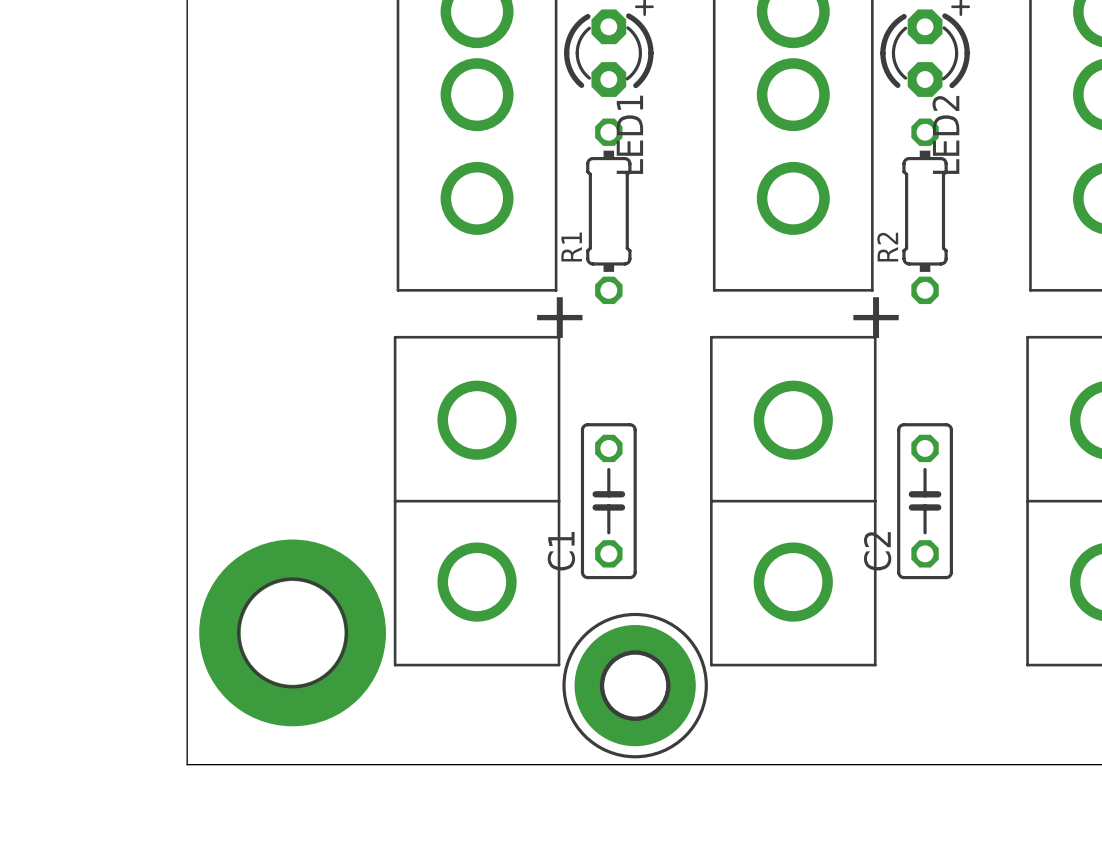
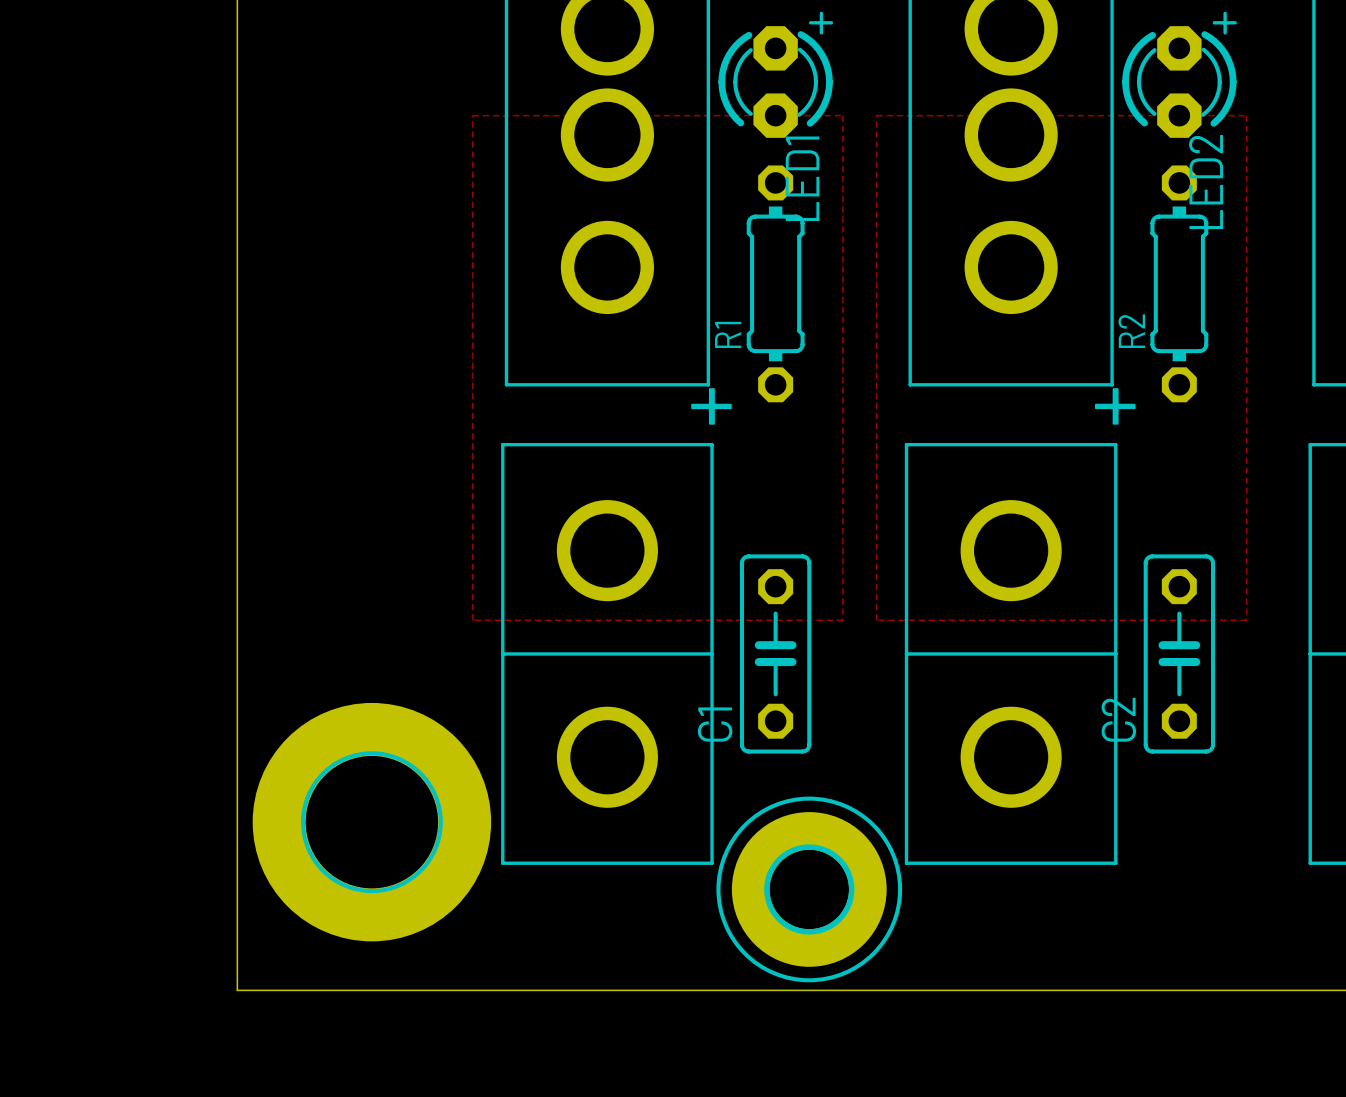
zone outline: none -> (472, 115) (842, 115) (842, 620) (472, 620) (472, 115)
zone outline: none -> (876, 115) (1246, 115) (1246, 620) (876, 620) (876, 115)

